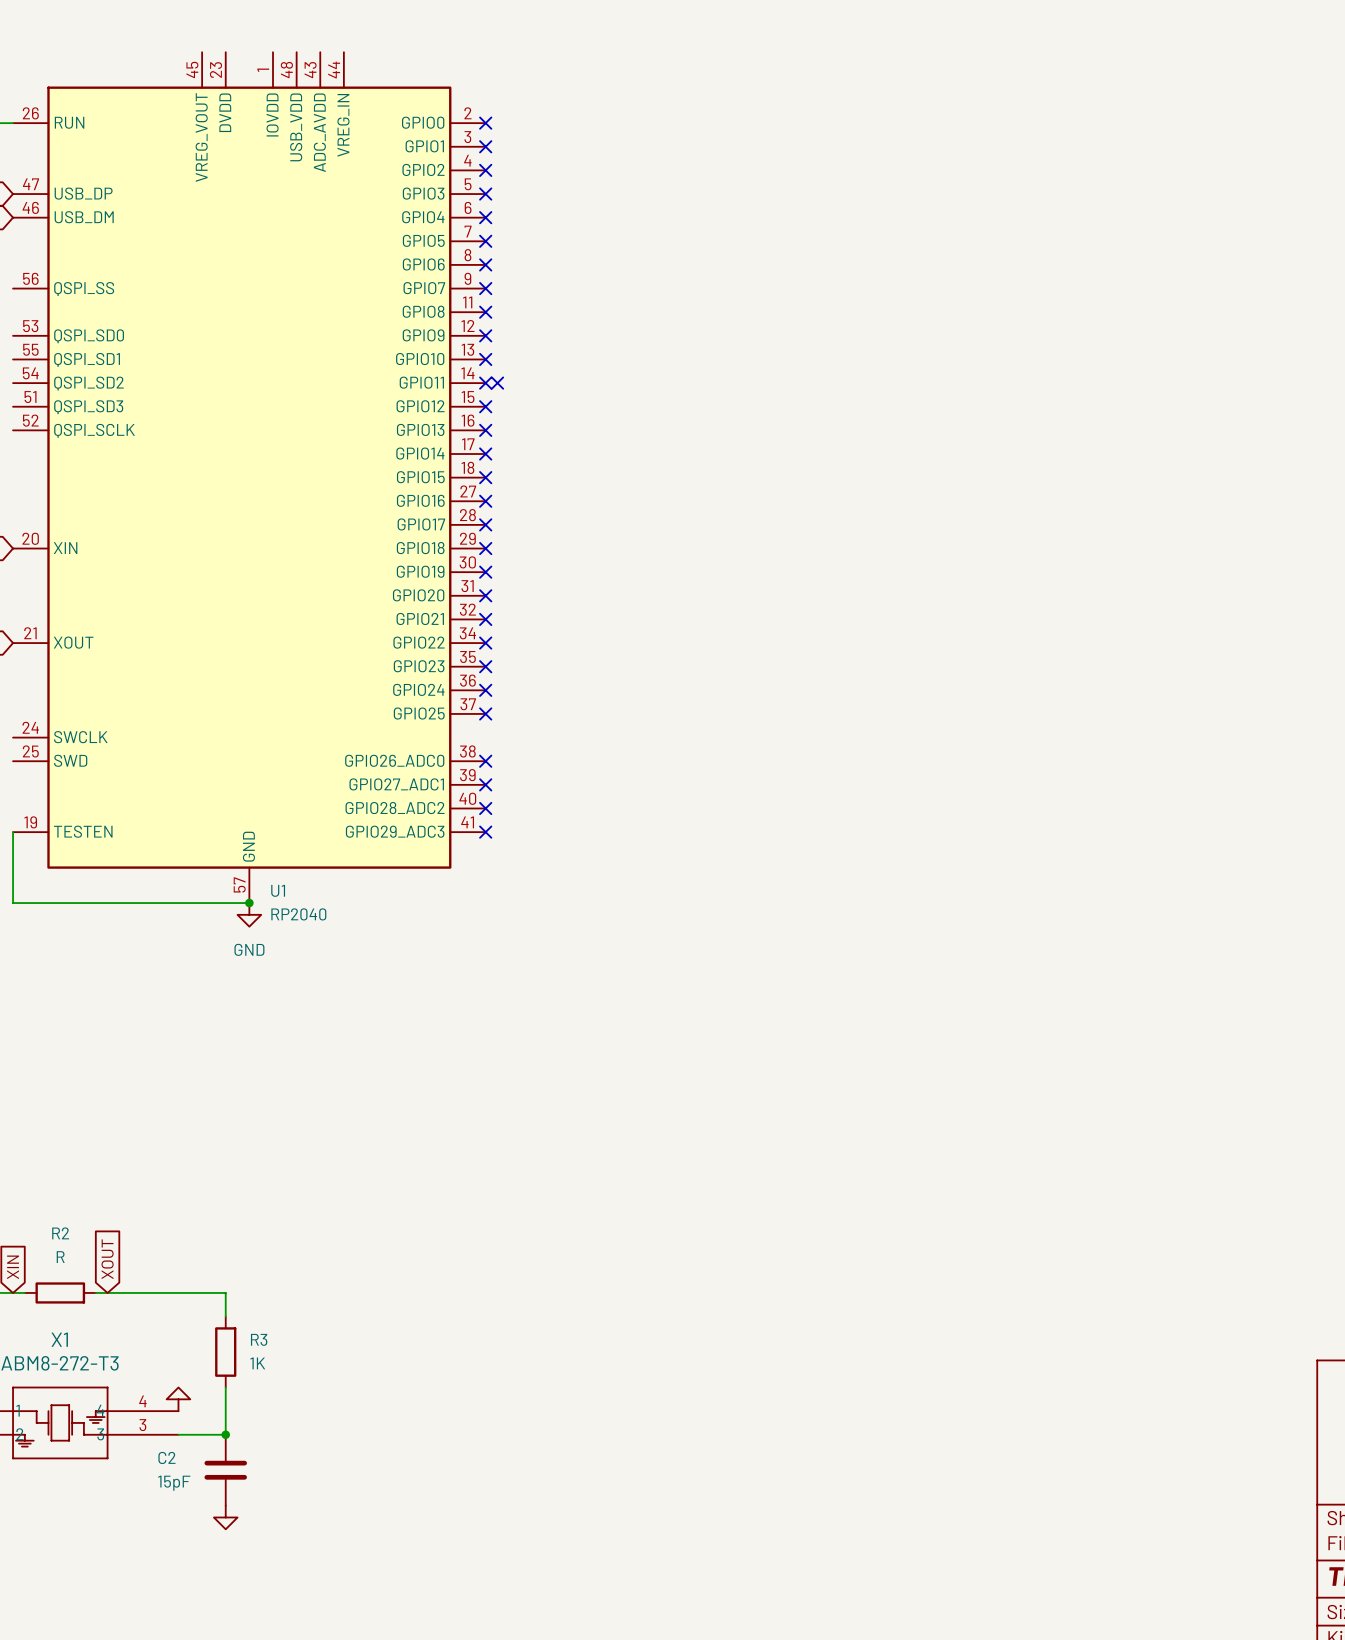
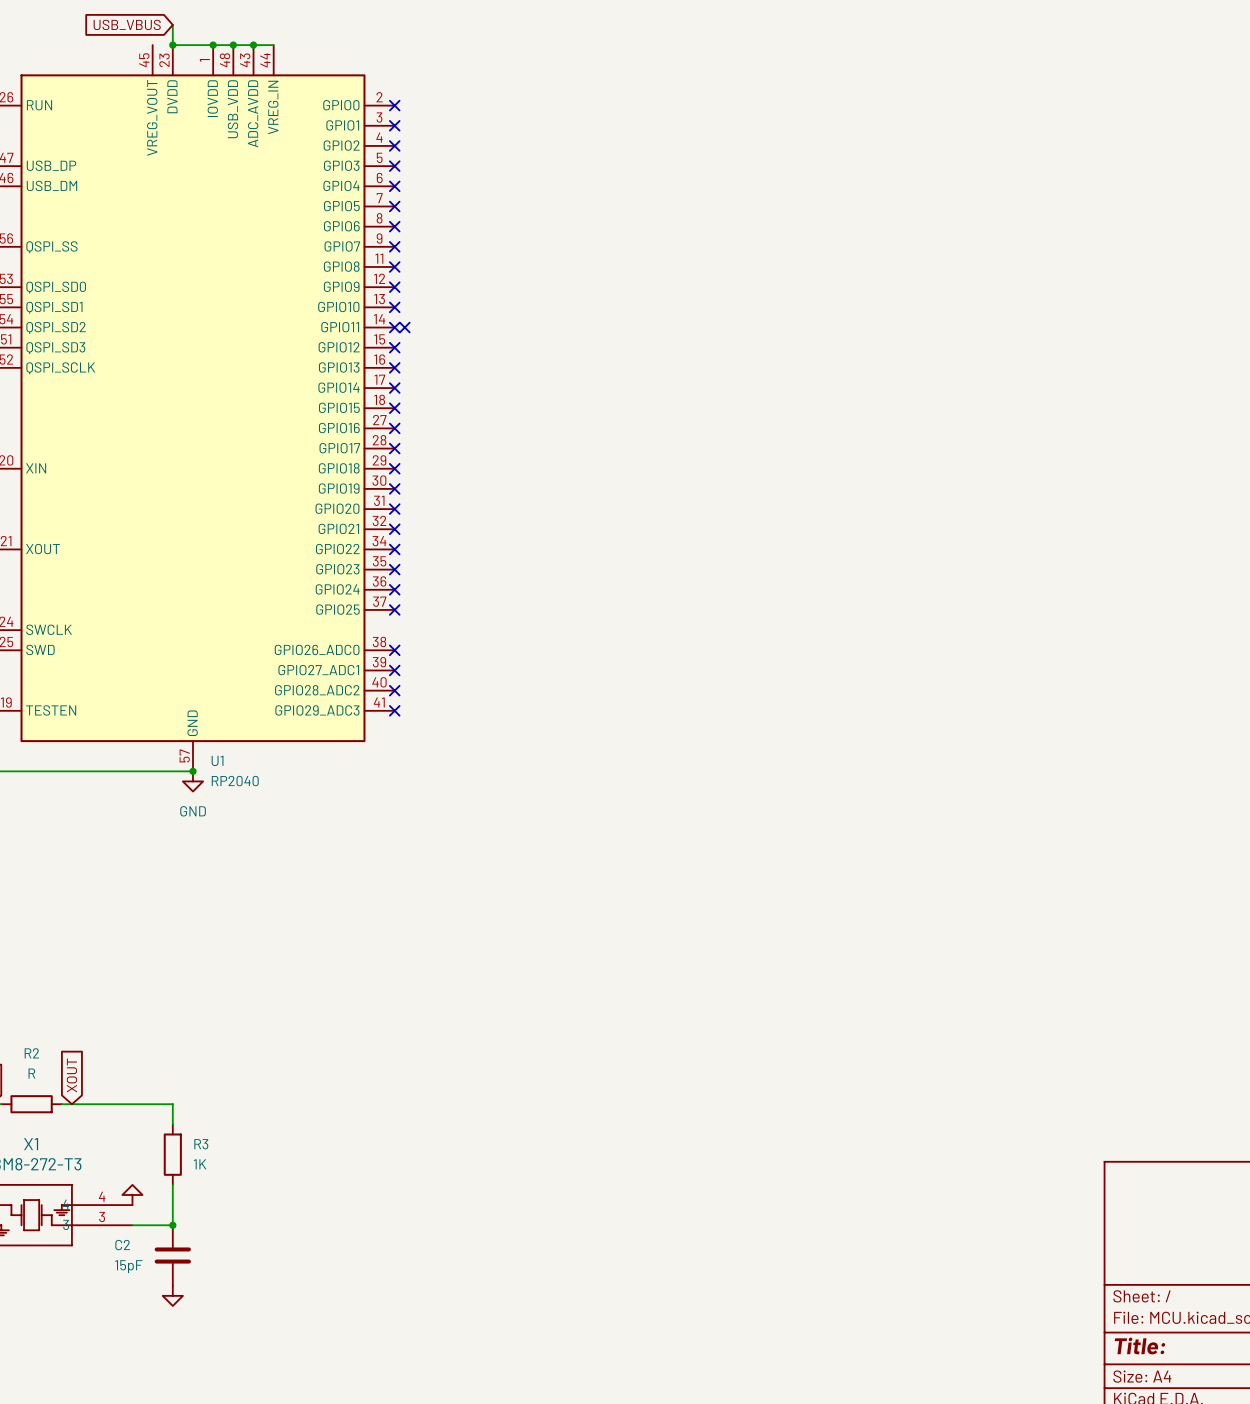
global label: none -> USB_VBUS (127, 24)
wire: none -> (172, 24) (172, 45) (273, 45)
junction: none -> (172, 45)
junction: none -> (213, 45)
junction: none -> (233, 45)
junction: none -> (253, 45)

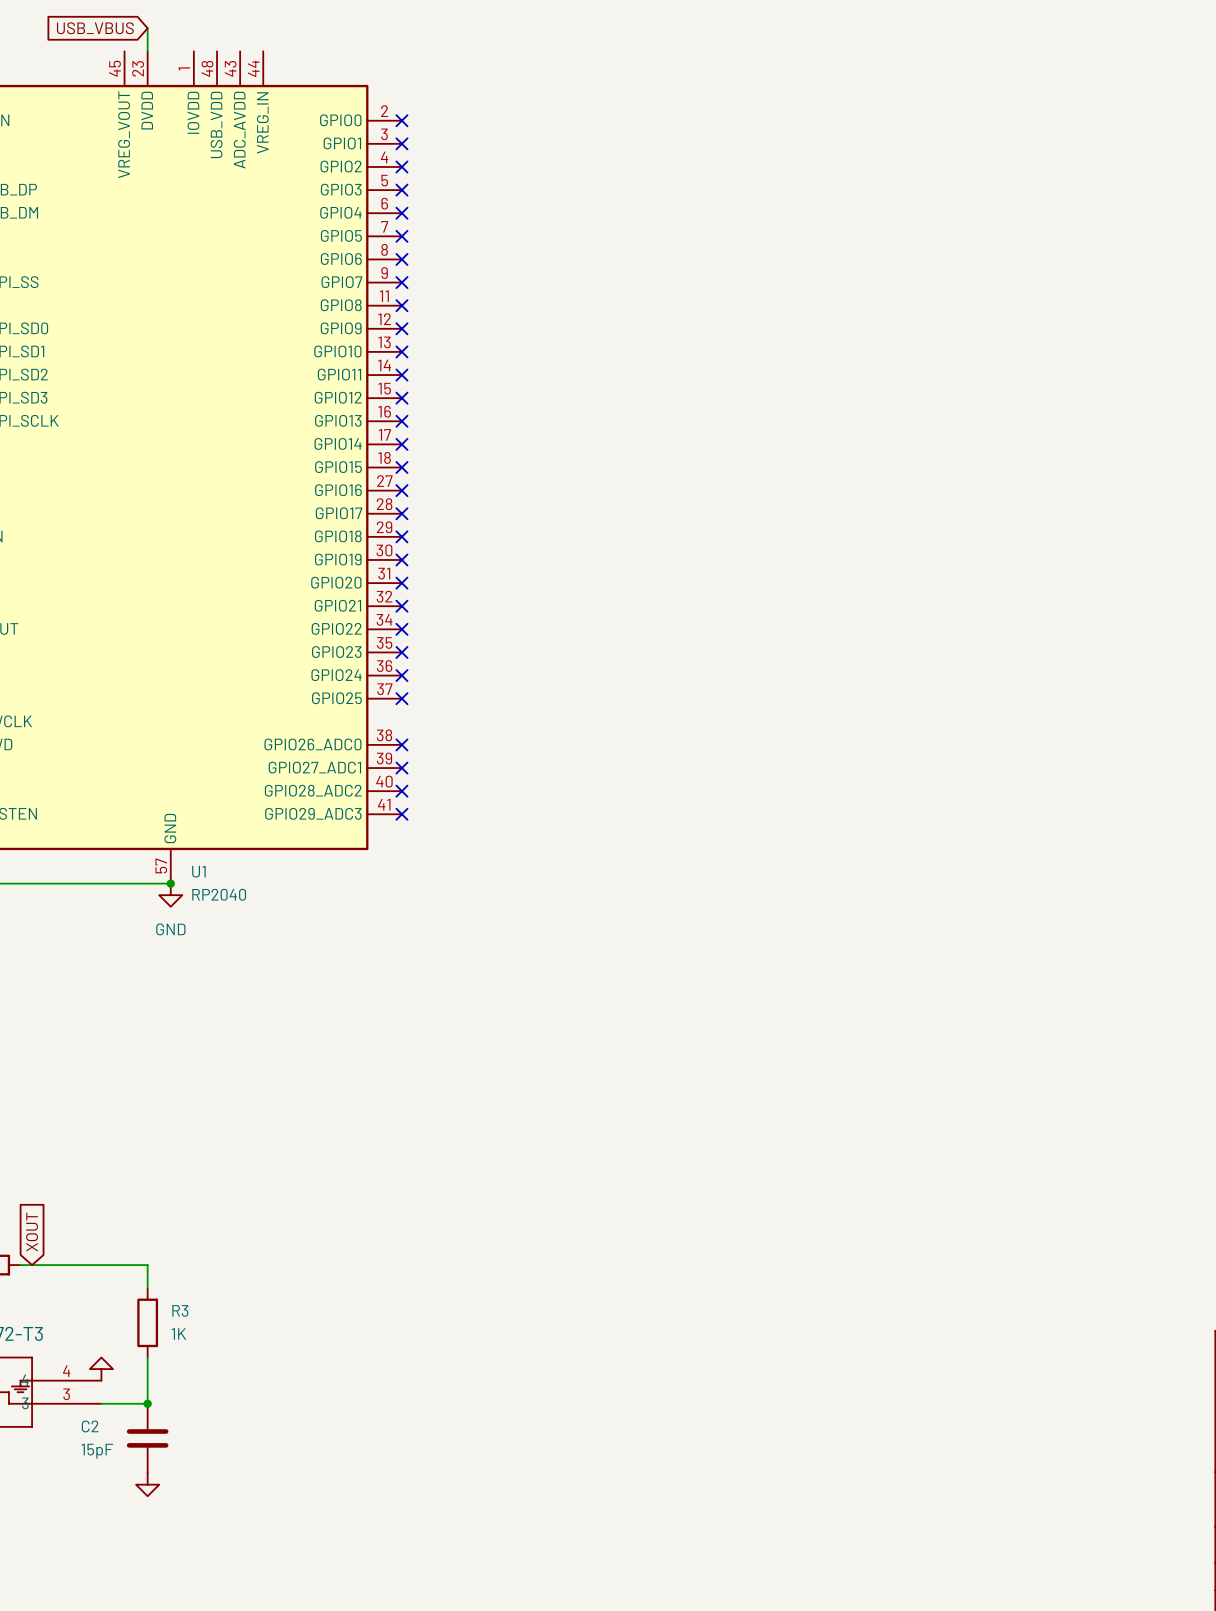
wire: (172, 45) (273, 45) -> none
junction: (172, 45) -> none
junction: (213, 45) -> none
junction: (233, 45) -> none
junction: (253, 45) -> none
no-connect mark: (404, 327) -> none

